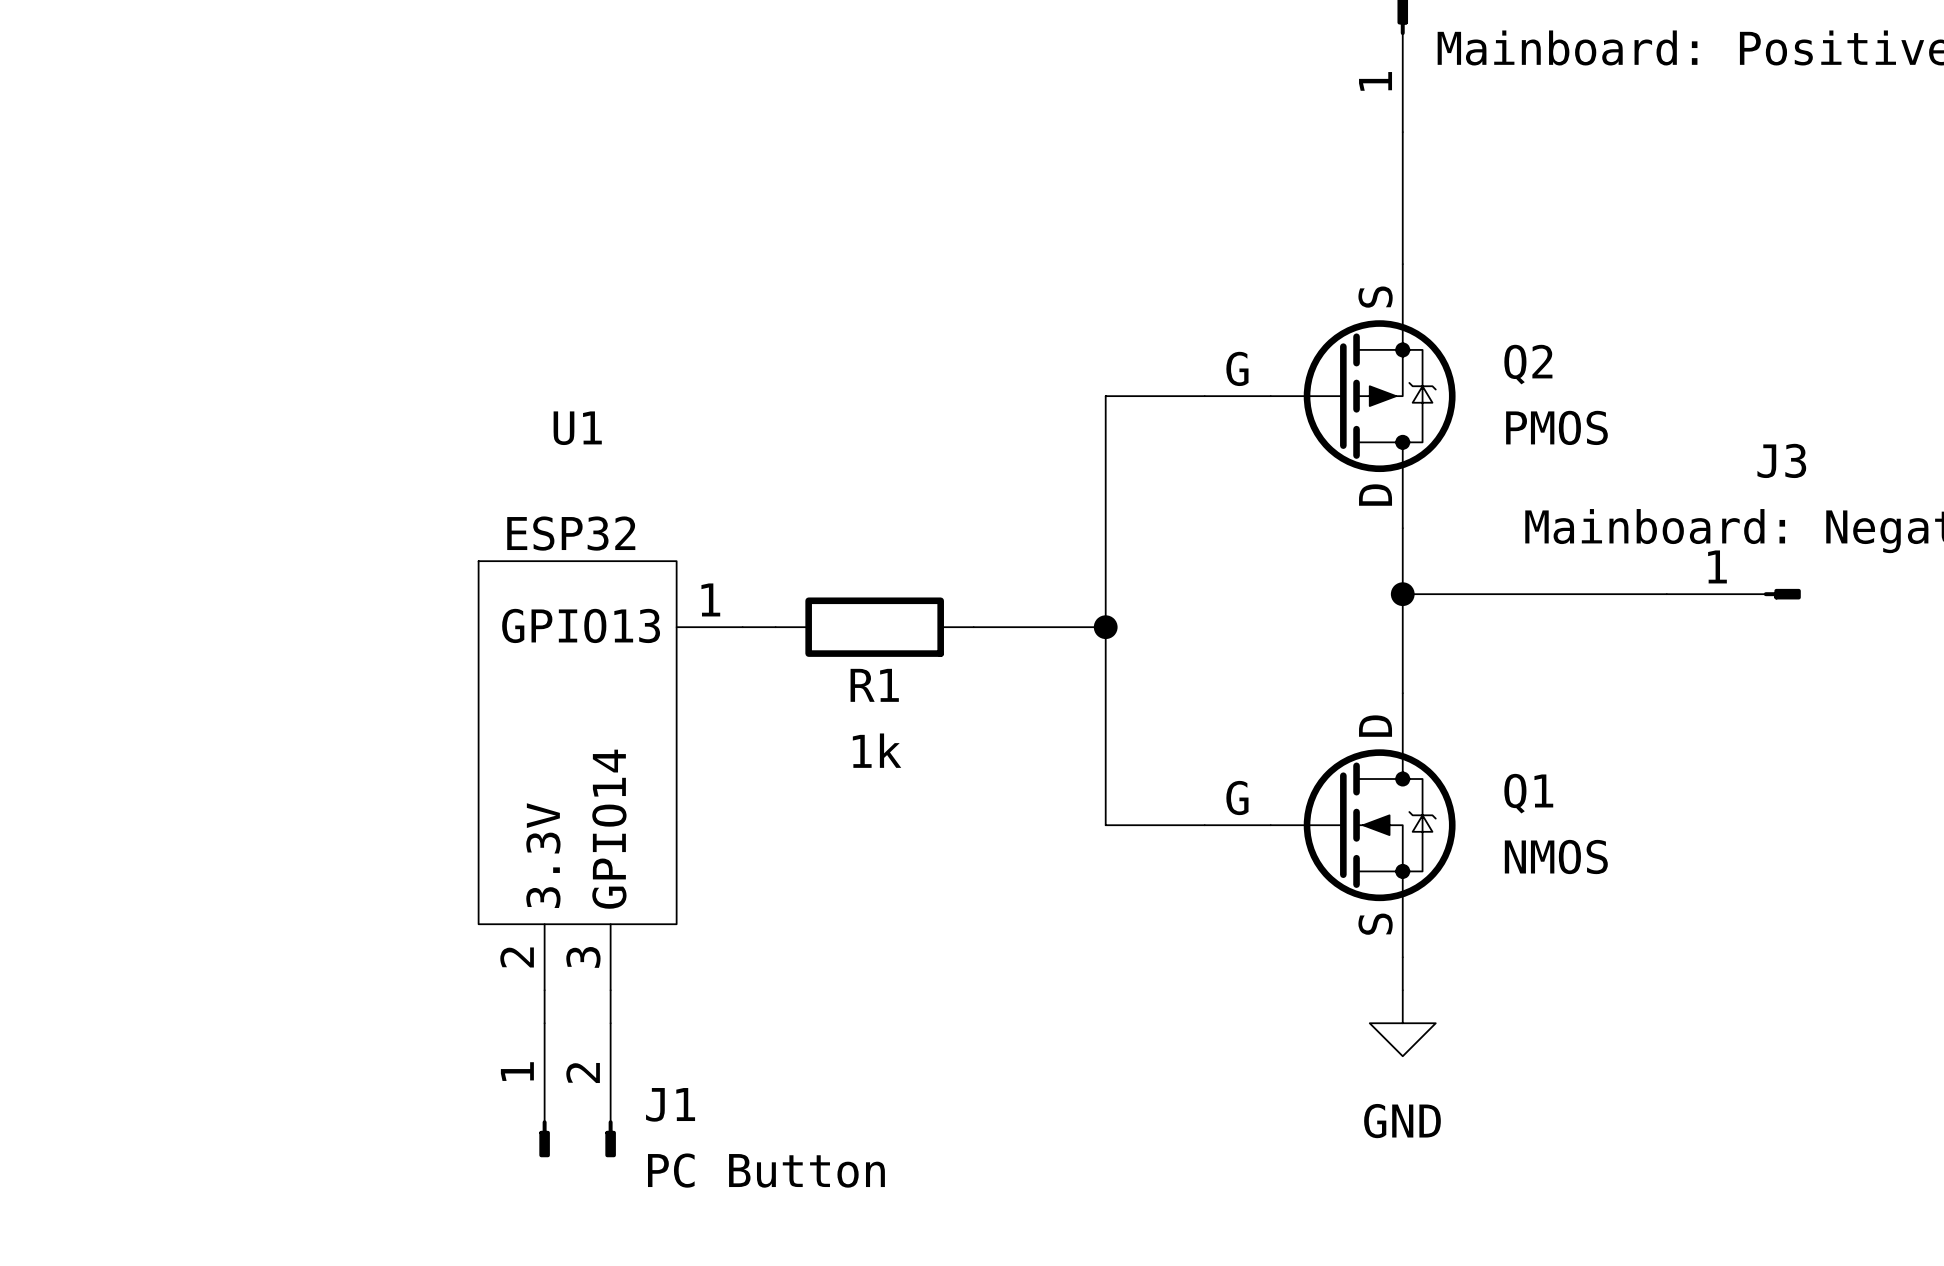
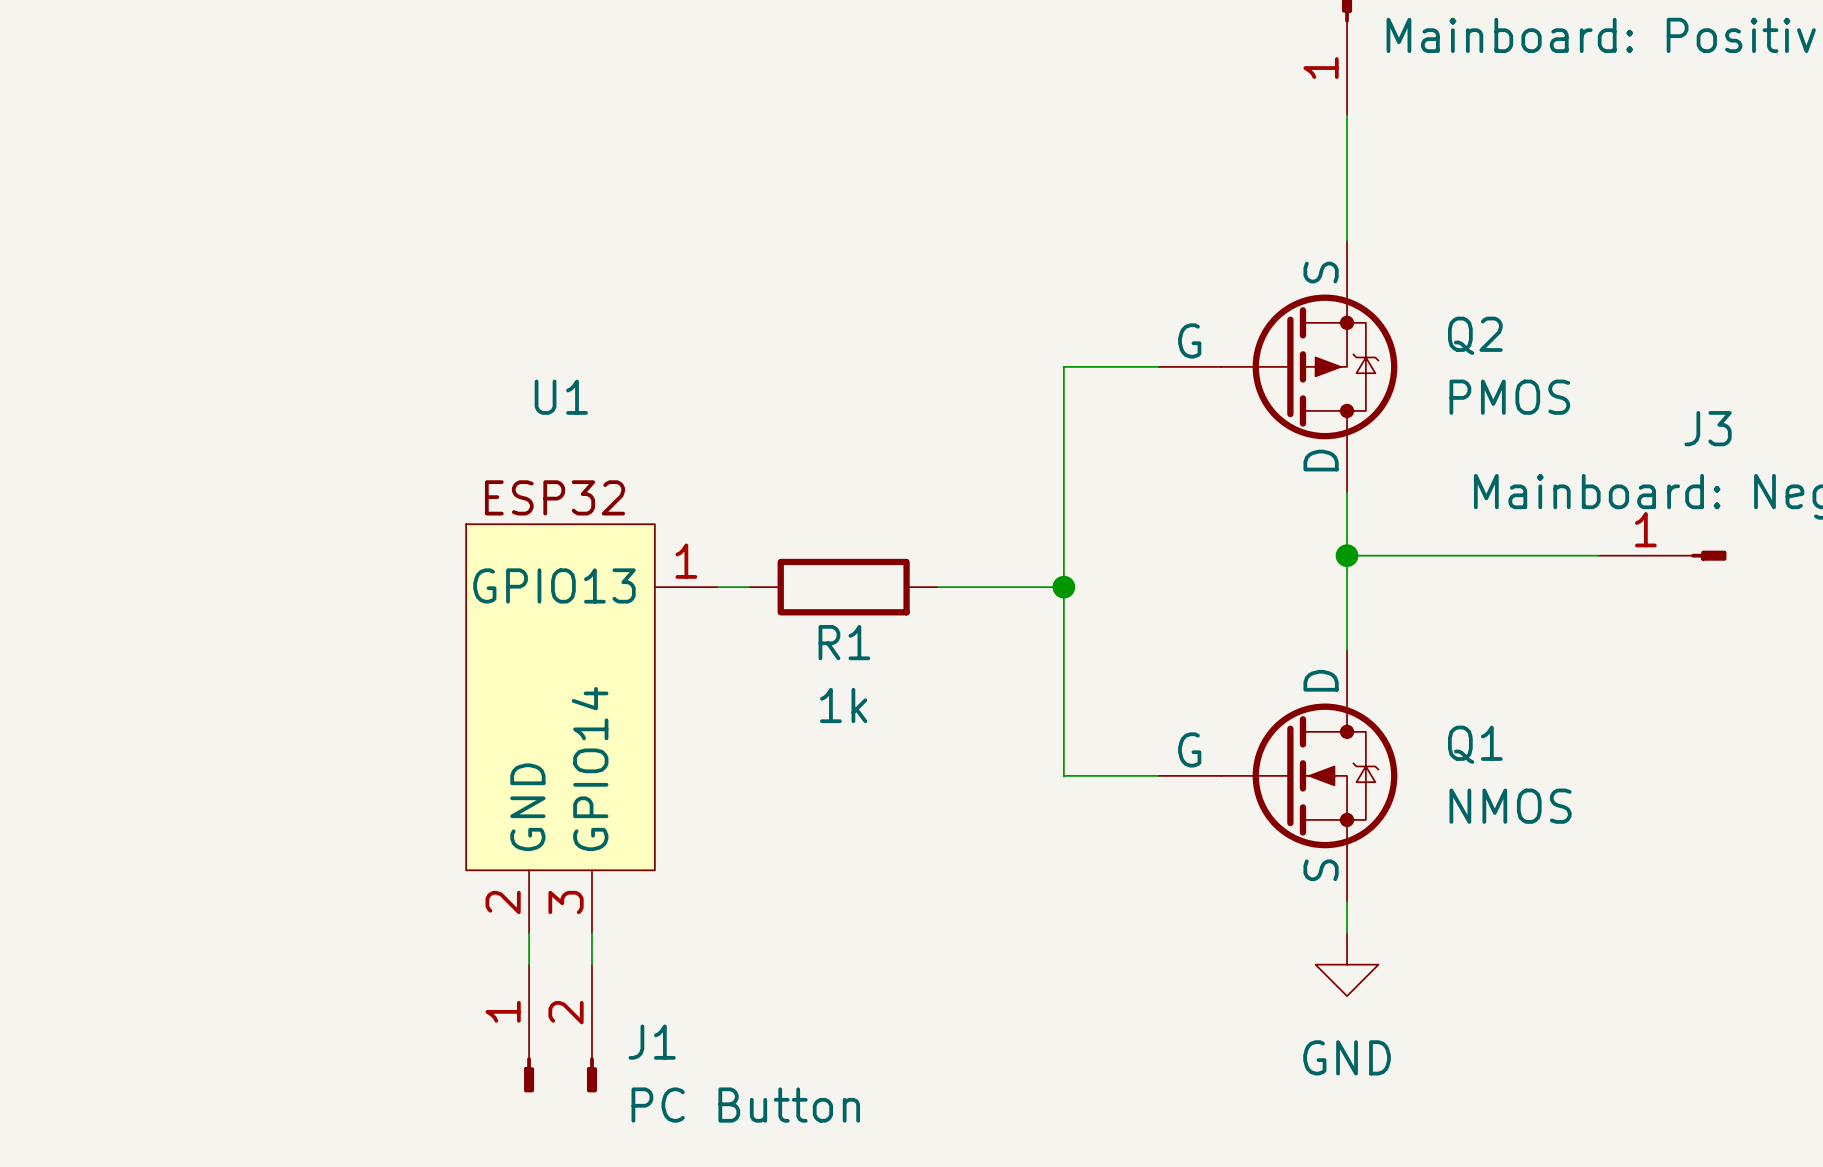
U1 pin name: 3.3V (543, 855) -> GND (527, 807)

